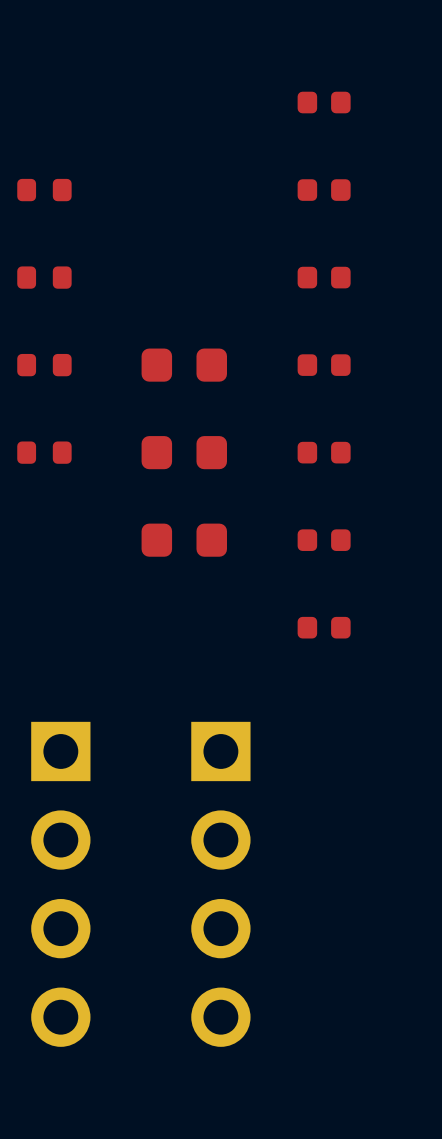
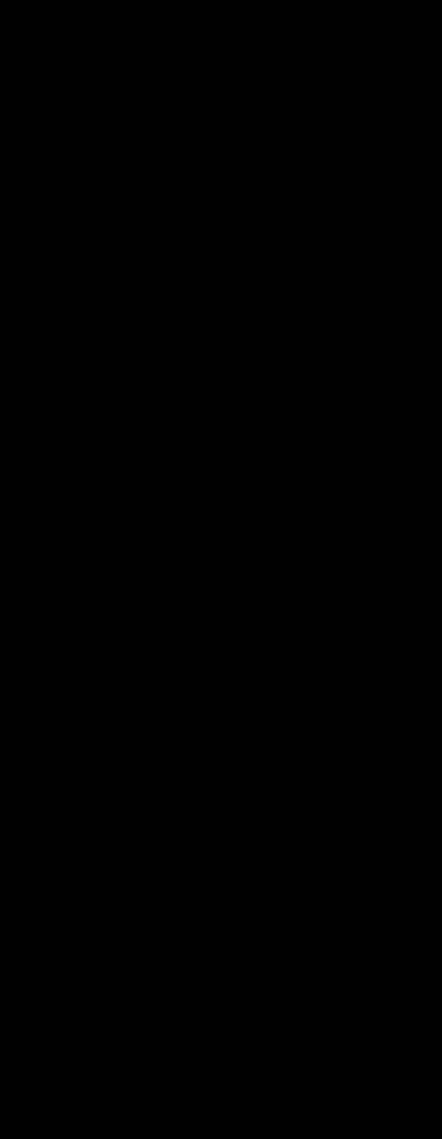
part: (324, 102) -> none
part: (44, 190) -> none
part: (324, 190) -> none
part: (44, 277) -> none
part: (324, 277) -> none
part: (44, 365) -> none
part: (184, 365) -> none
part: (324, 365) -> none
part: (44, 452) -> none
part: (184, 452) -> none
part: (324, 452) -> none
part: (184, 540) -> none
part: (324, 540) -> none
part: (324, 627) -> none
part: (60, 884) -> none
part: (220, 884) -> none

